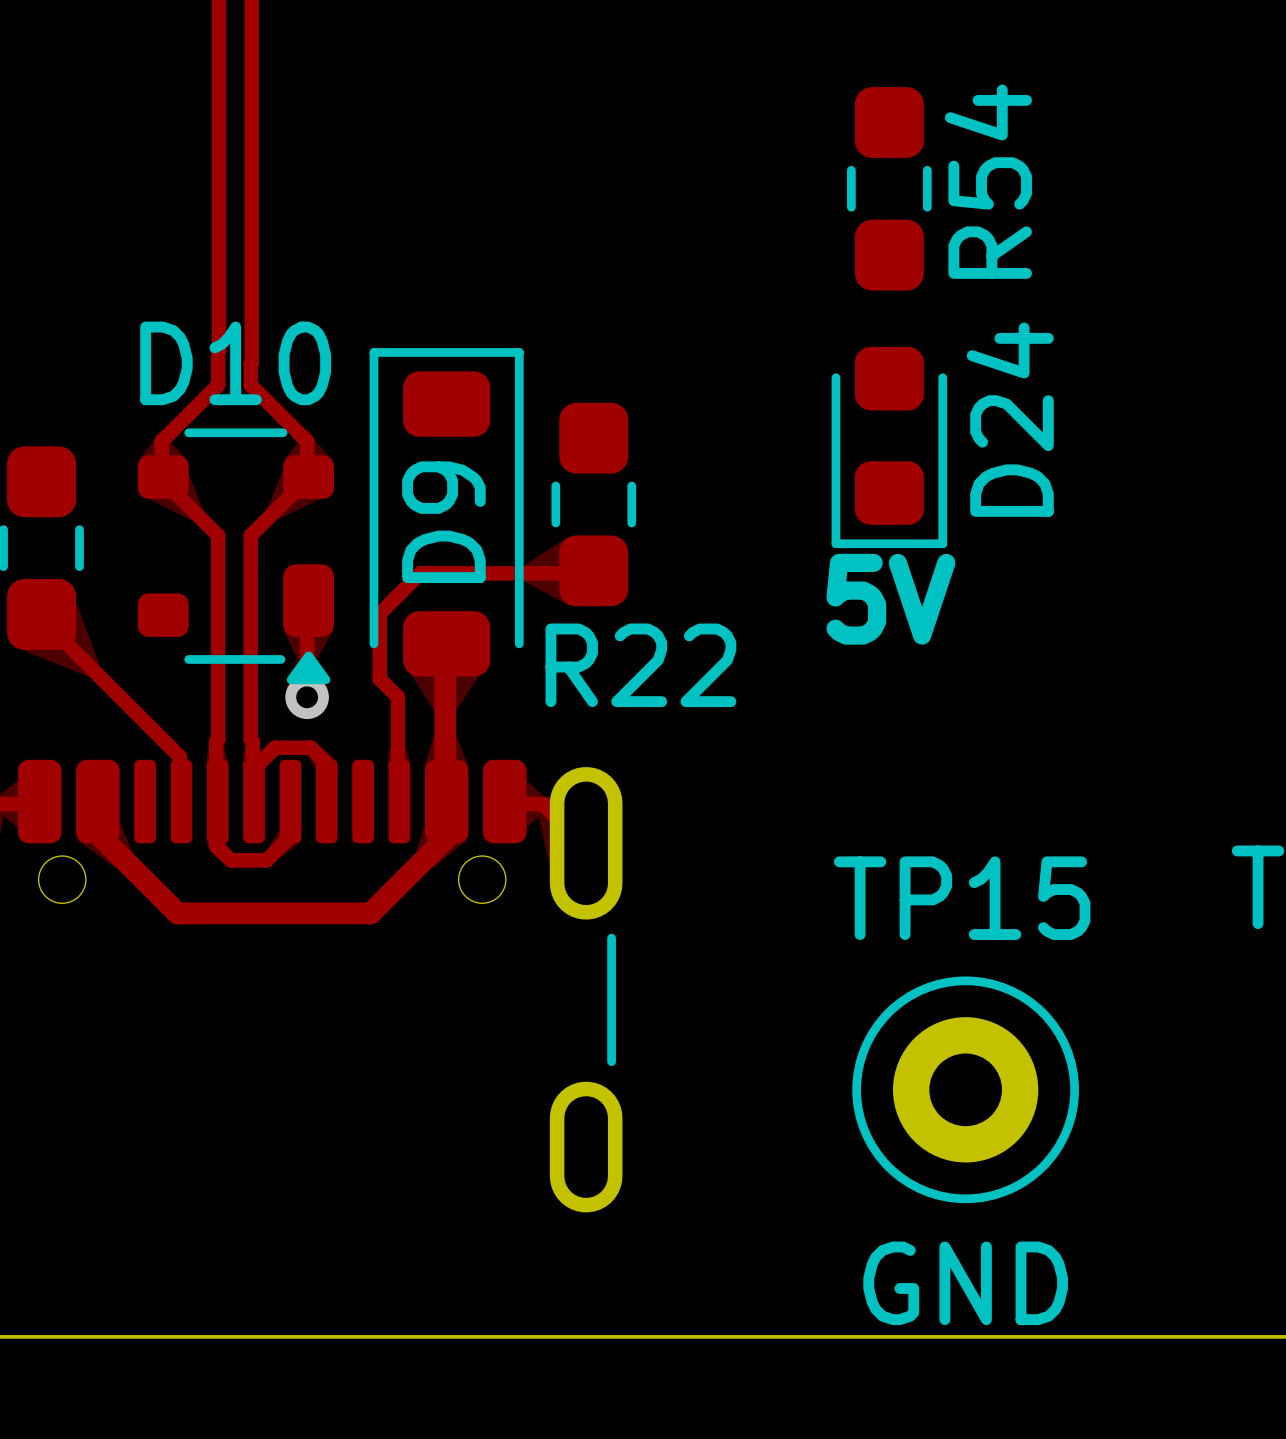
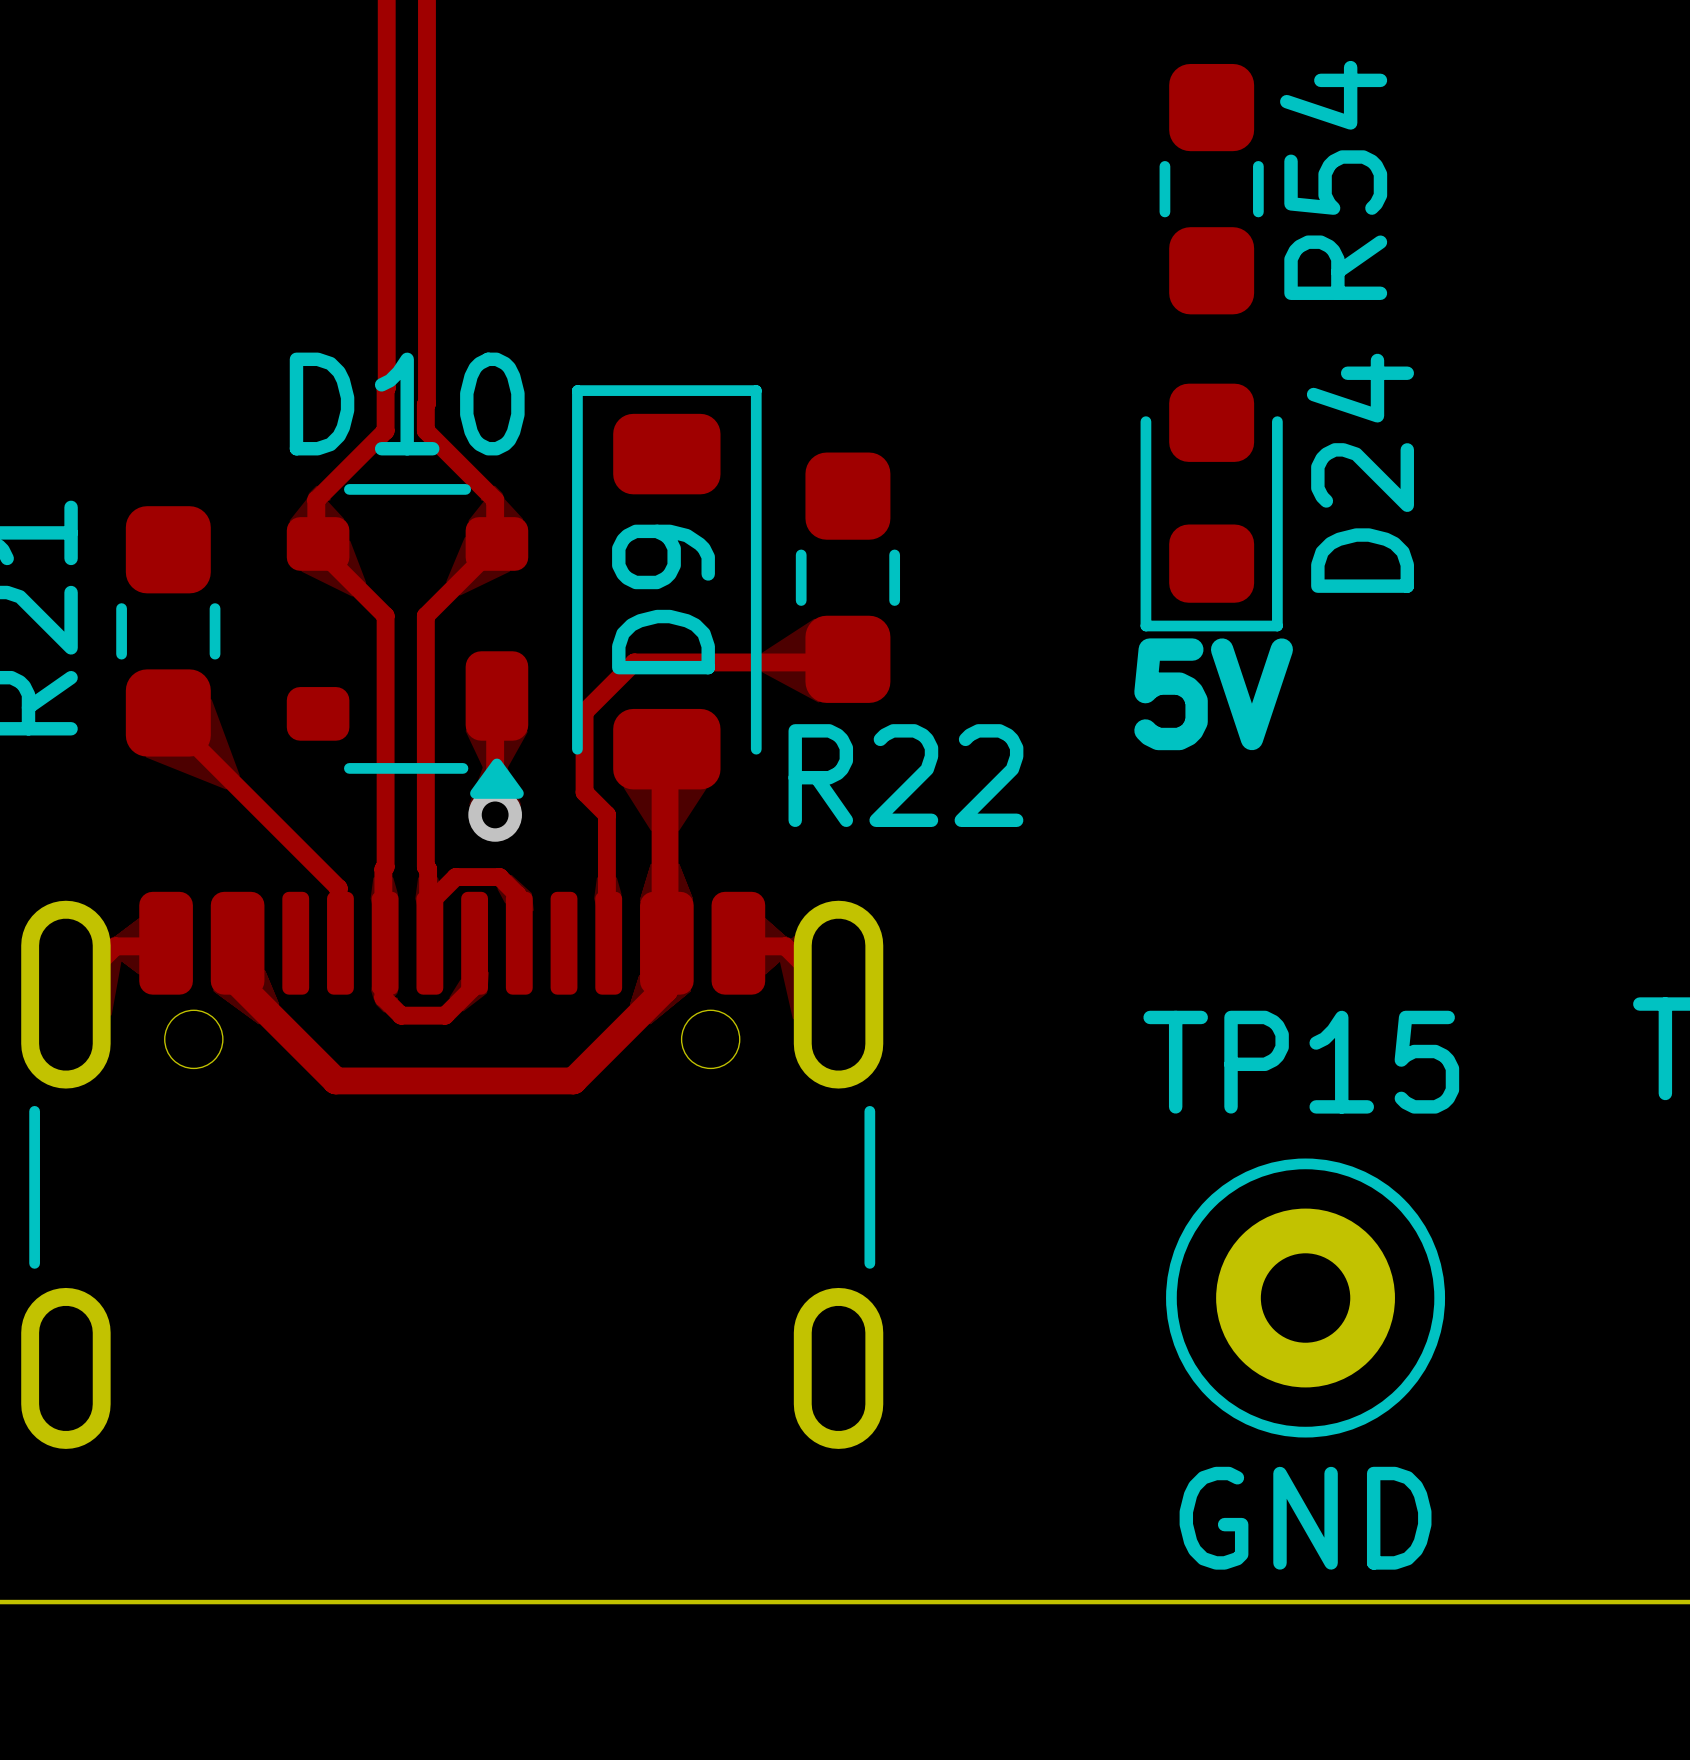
TP15 value position: GND (965, 1283) -> GND (1305, 1518)

